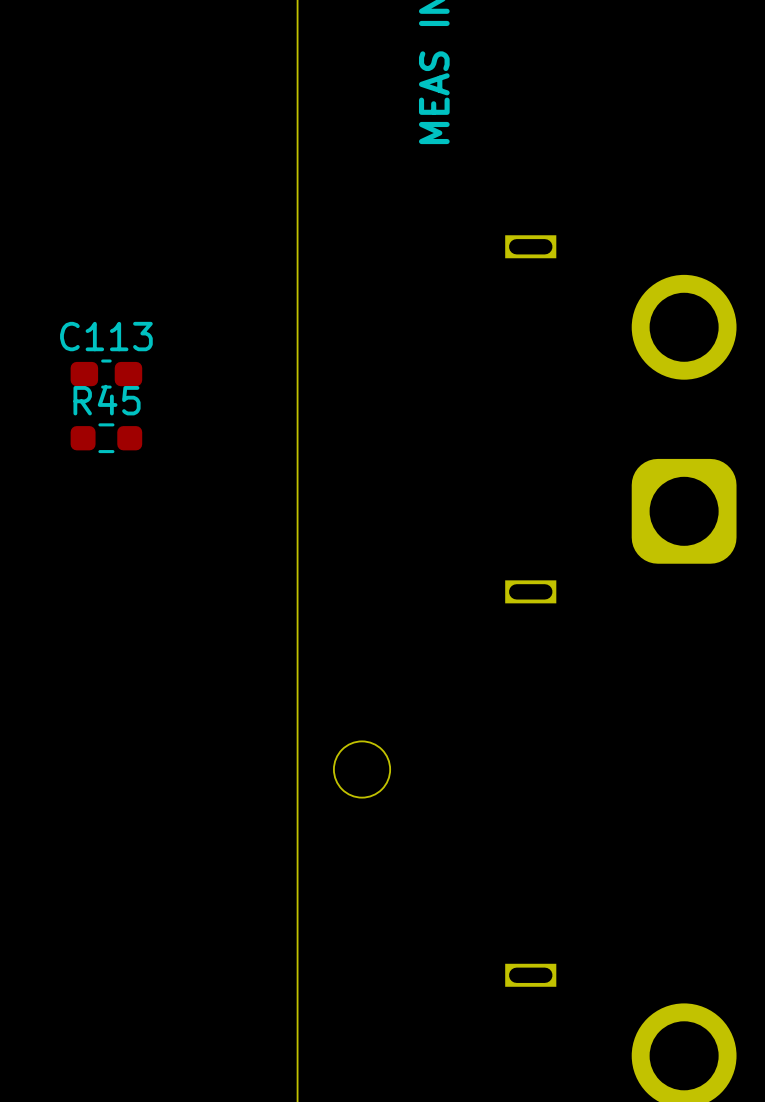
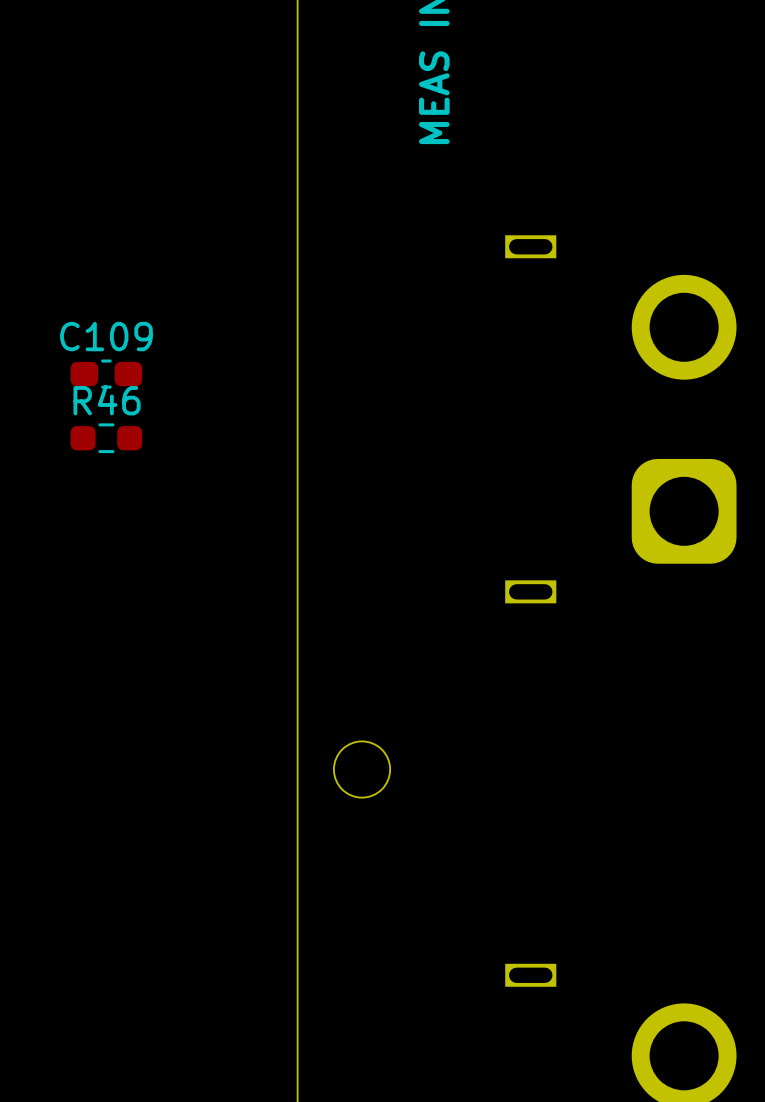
C113 name: C113 (106, 336) -> C109 (106, 336)
R45 name: R45 (107, 400) -> R46 (107, 400)

